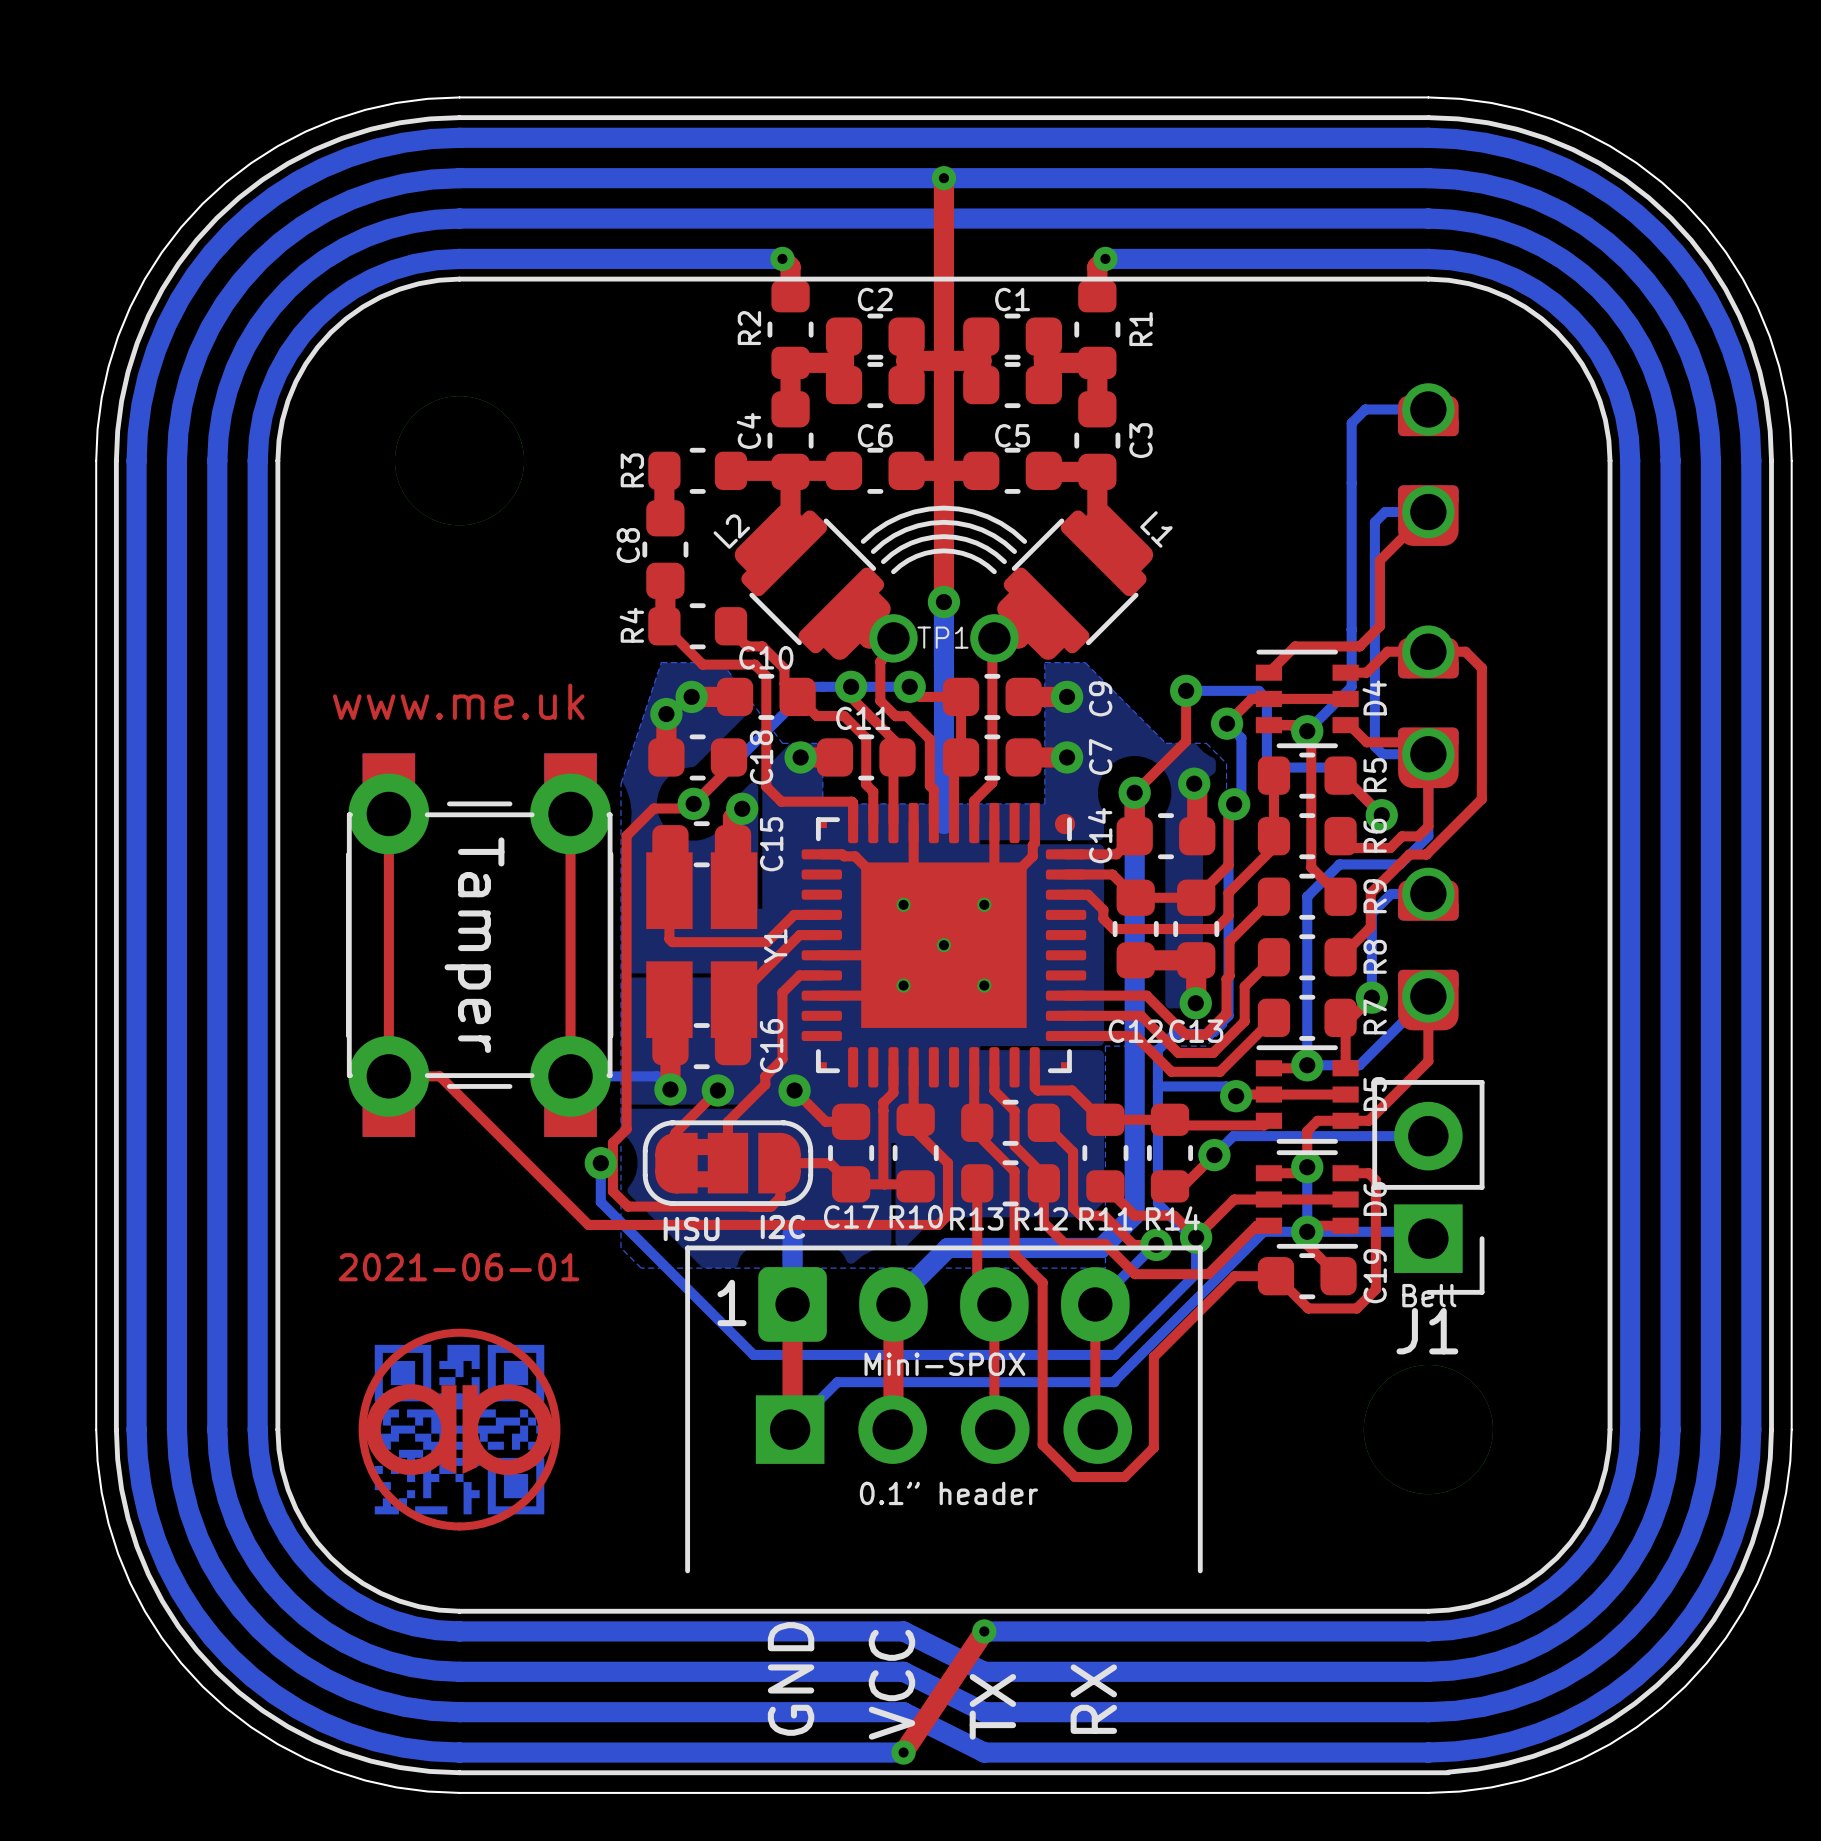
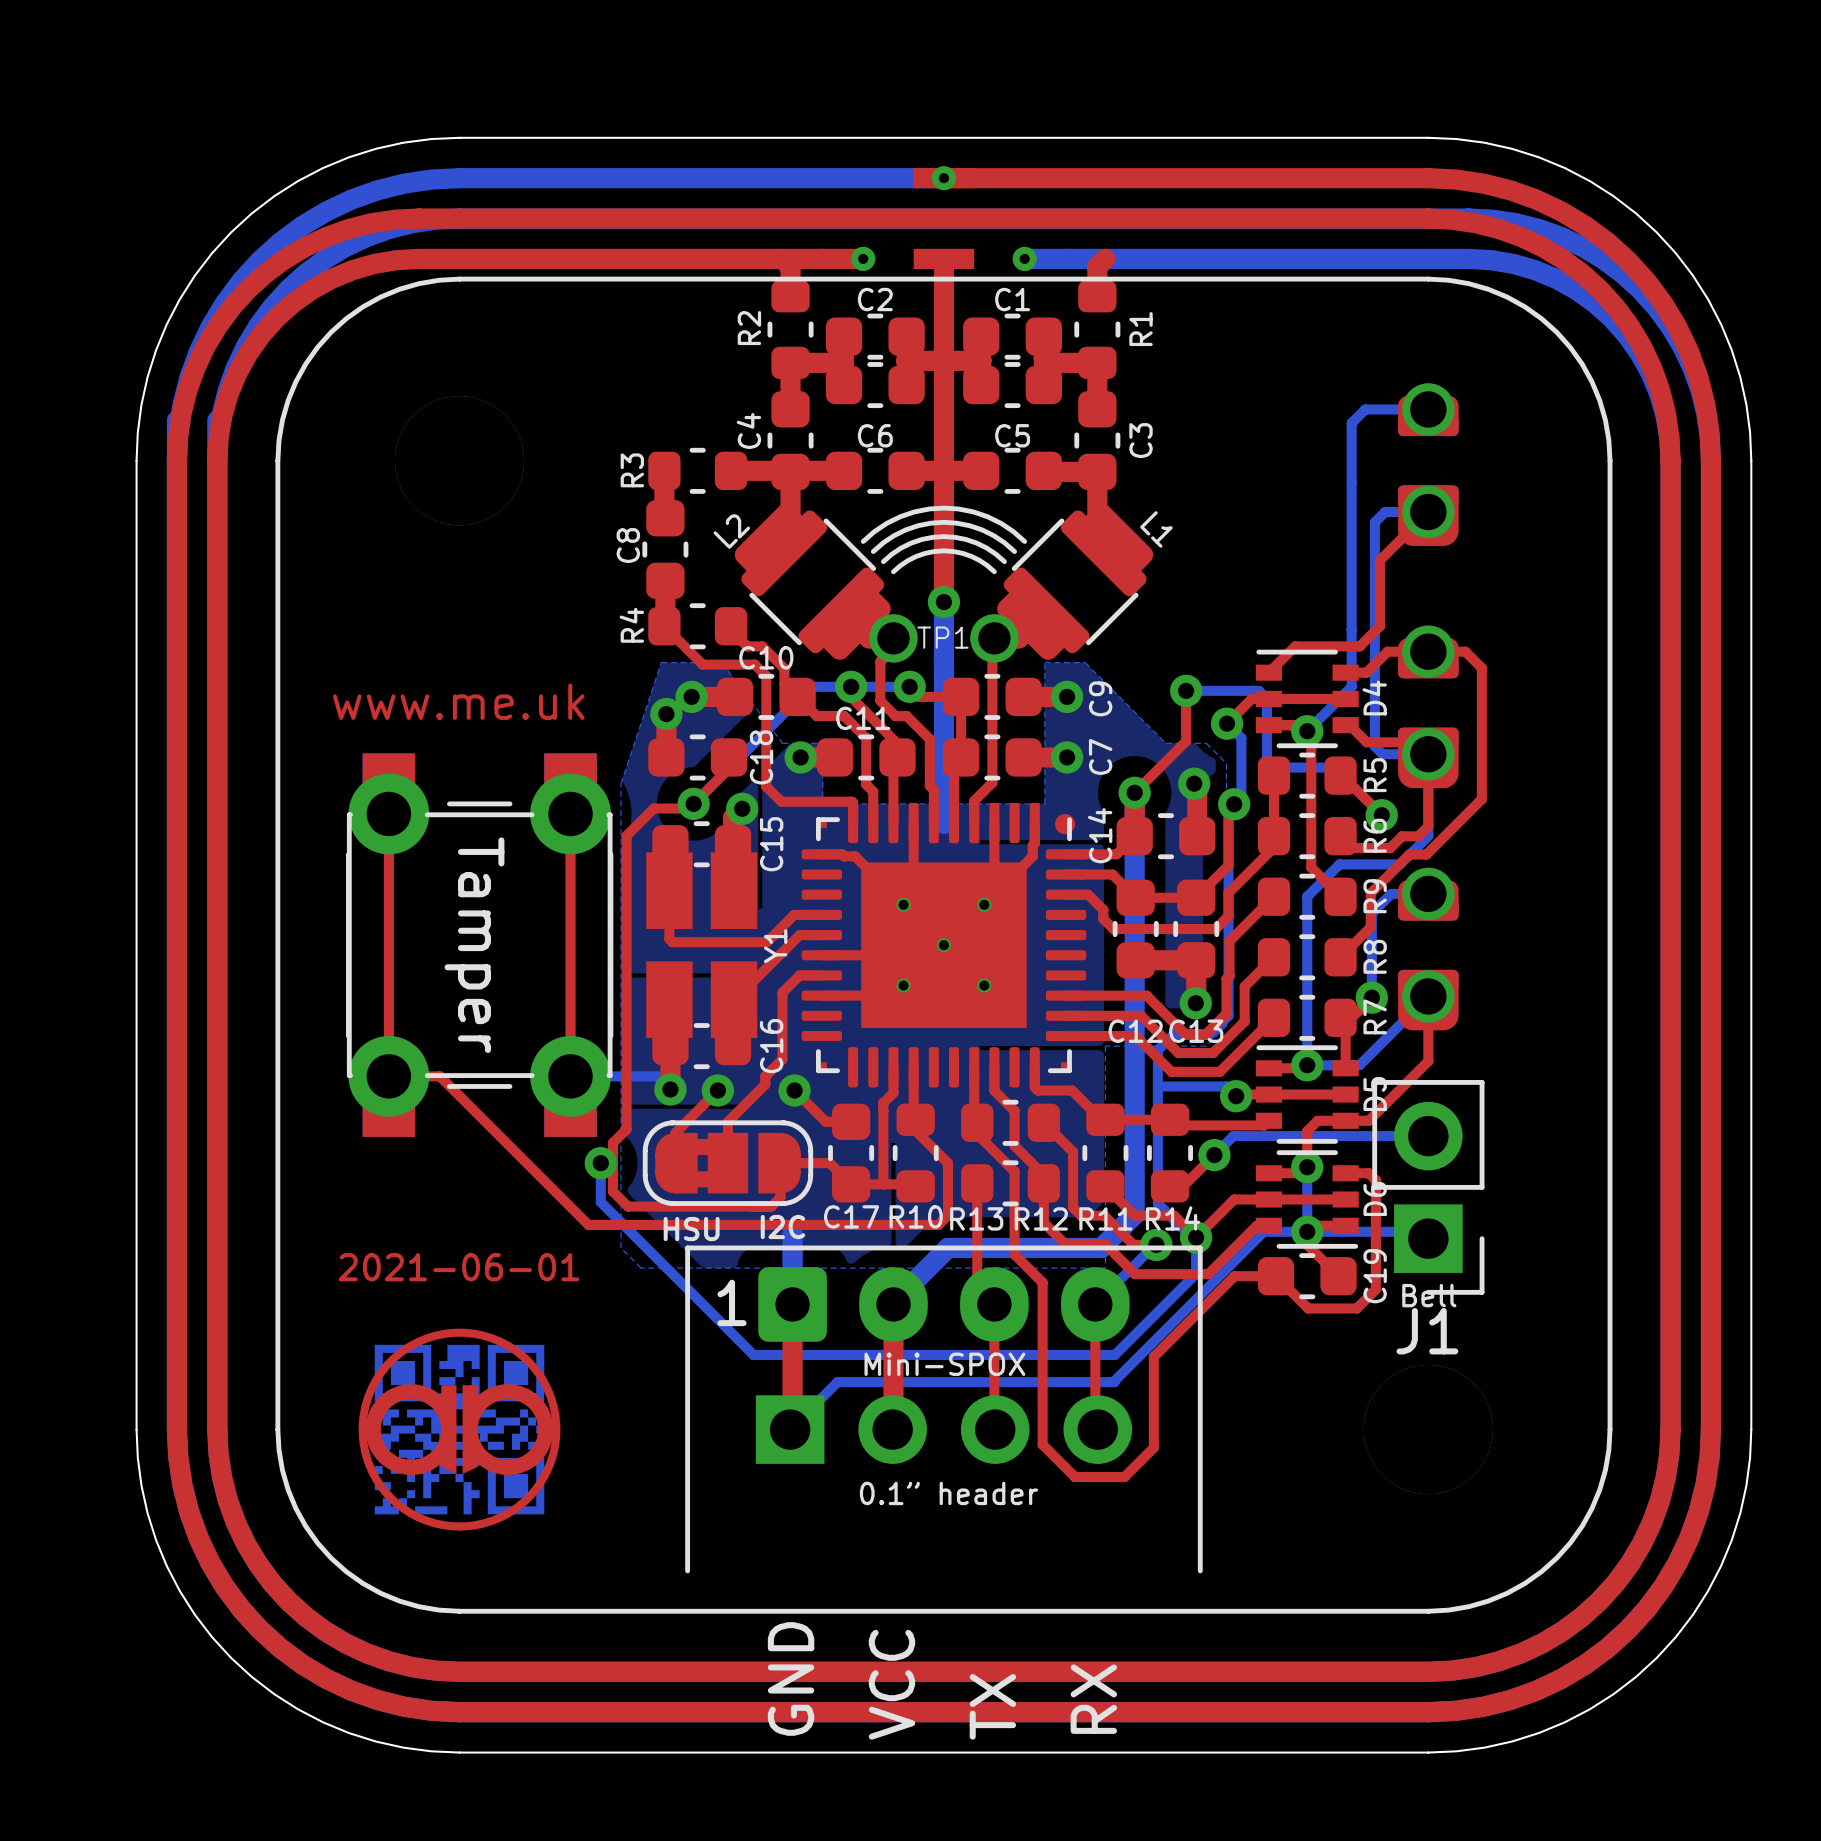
board edge: (459, 97) (1460, 98) (1522, 109) (1552, 119) (1610, 146) (1661, 182) (1706, 227) (1725, 252) (1743, 279) (1769, 336) (1786, 397) (1790, 429) (1790, 1461) (1779, 1523) (1769, 1553) (1743, 1611) (1706, 1663) (1661, 1707) (1636, 1727) (1610, 1744) (1552, 1771) (1491, 1787) (1460, 1791) (427, 1791) (365, 1780) (335, 1771) (277, 1744) (225, 1707) (181, 1663) (161, 1637) (144, 1611) (118, 1553) (101, 1492) (97, 1461) (96, 460) (101, 397) (118, 336) (144, 279) (181, 227) (225, 182) (277, 146) (335, 119) (396, 102) (459, 97) -> (459, 137) (403, 142) (349, 157) (298, 181) (251, 213) (212, 253) (179, 299) (156, 350) (141, 404) (136, 460) (137, 1457) (141, 1485) (156, 1540) (179, 1591) (194, 1614) (212, 1637) (251, 1676) (298, 1709) (349, 1733) (403, 1747) (431, 1751) (1456, 1751) (1484, 1747) (1538, 1733) (1589, 1709) (1613, 1694) (1635, 1676) (1675, 1637) (1708, 1591) (1731, 1540) (1746, 1485) (1750, 1457) (1750, 432) (1746, 404) (1731, 350) (1708, 299) (1692, 275) (1675, 253) (1635, 213) (1589, 181) (1538, 157) (1484, 142) (1456, 139) (459, 137)
part footprint: [113, 115, 1774, 1776] -> [166, 166, 1722, 1723]
top track: (943, 178) (943, 258) -> none

